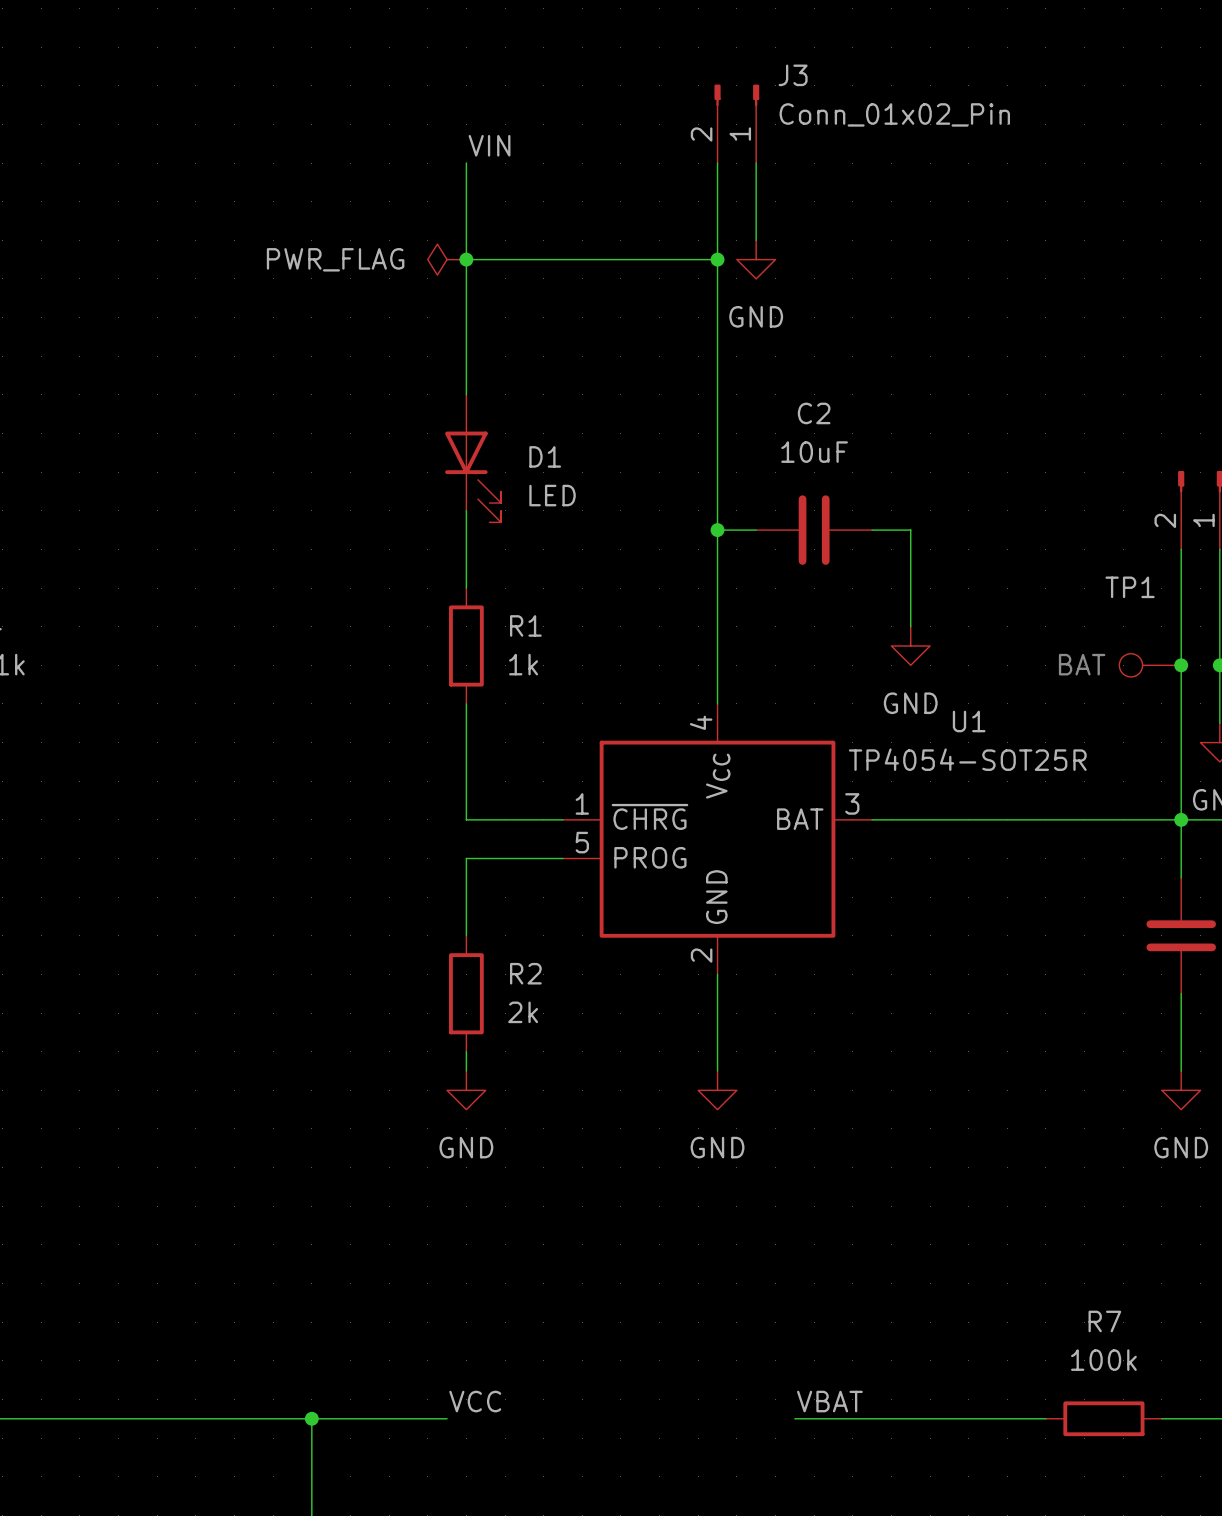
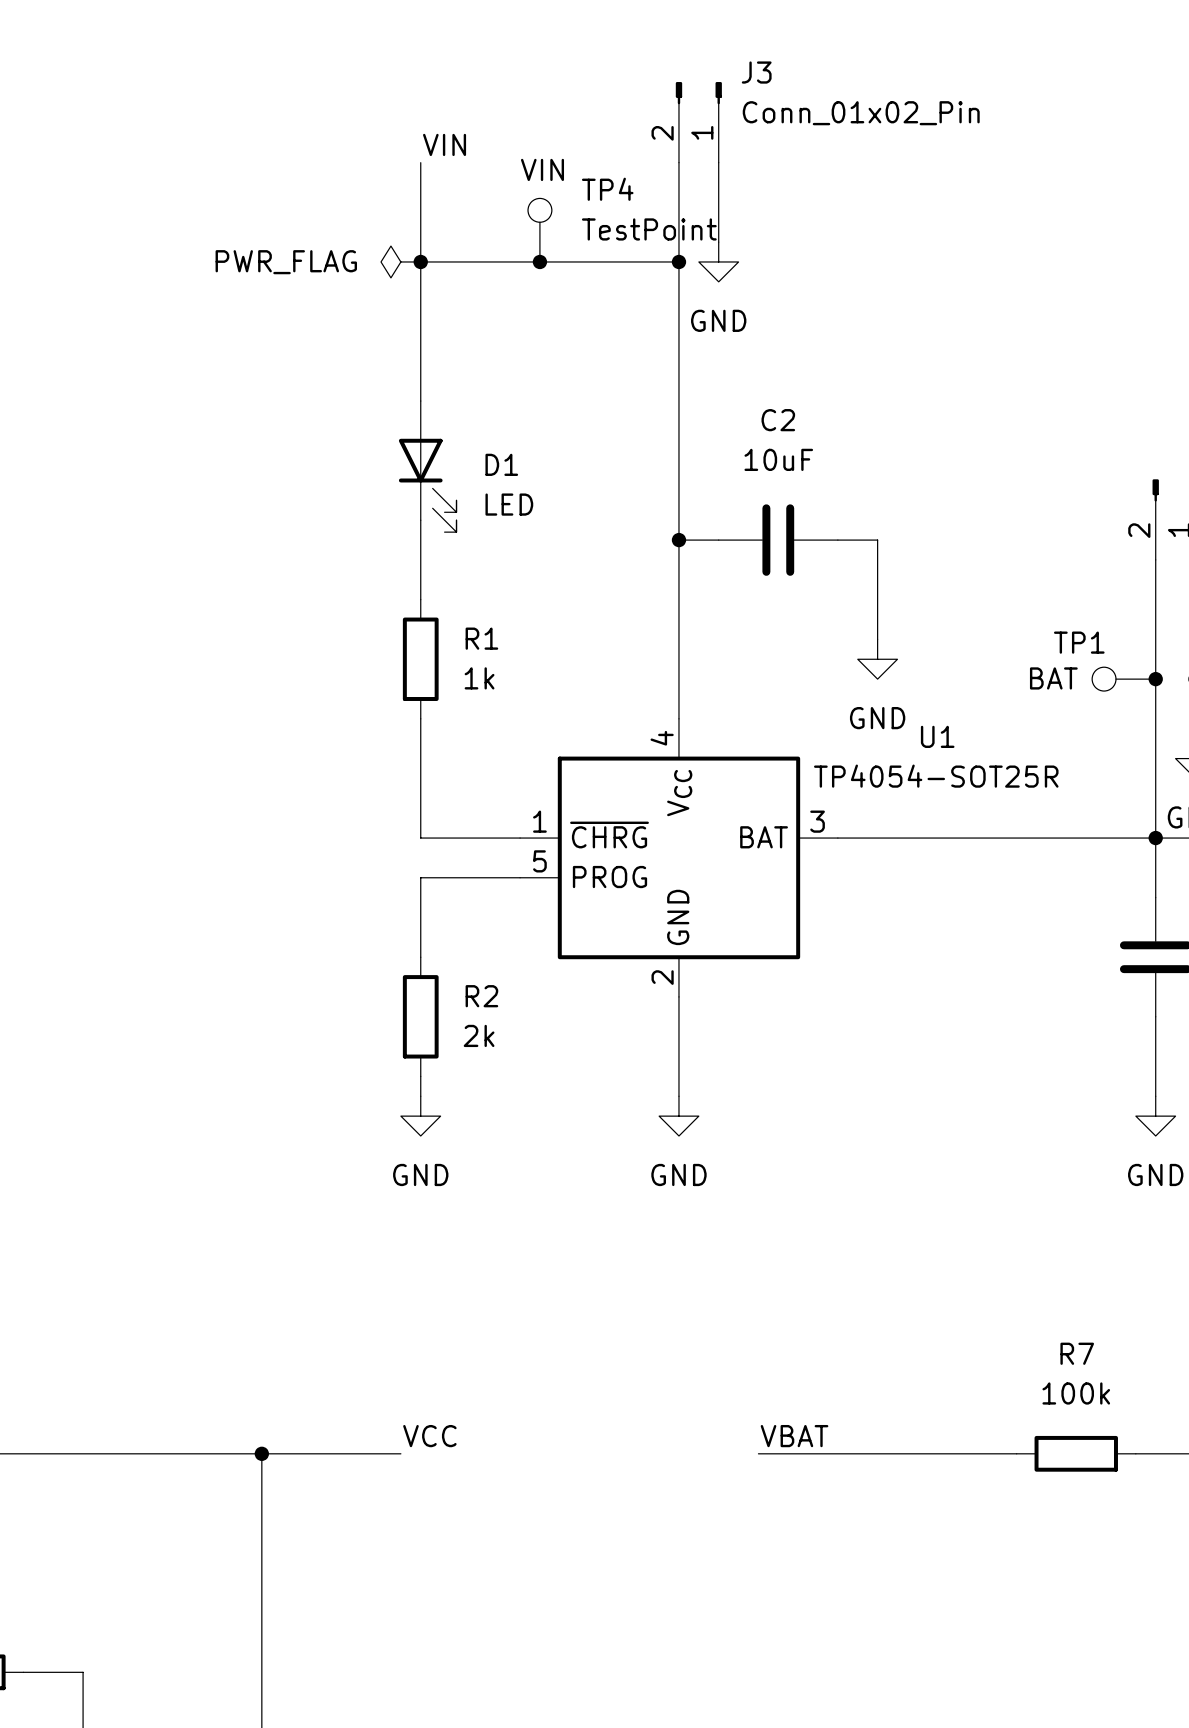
text: none -> VIN (542, 169)
TP4: none -> TestPoint (539, 230)
junction: none -> (539, 261)
TP1 name position: TP1 (1130, 587) -> TP1 (1079, 642)

